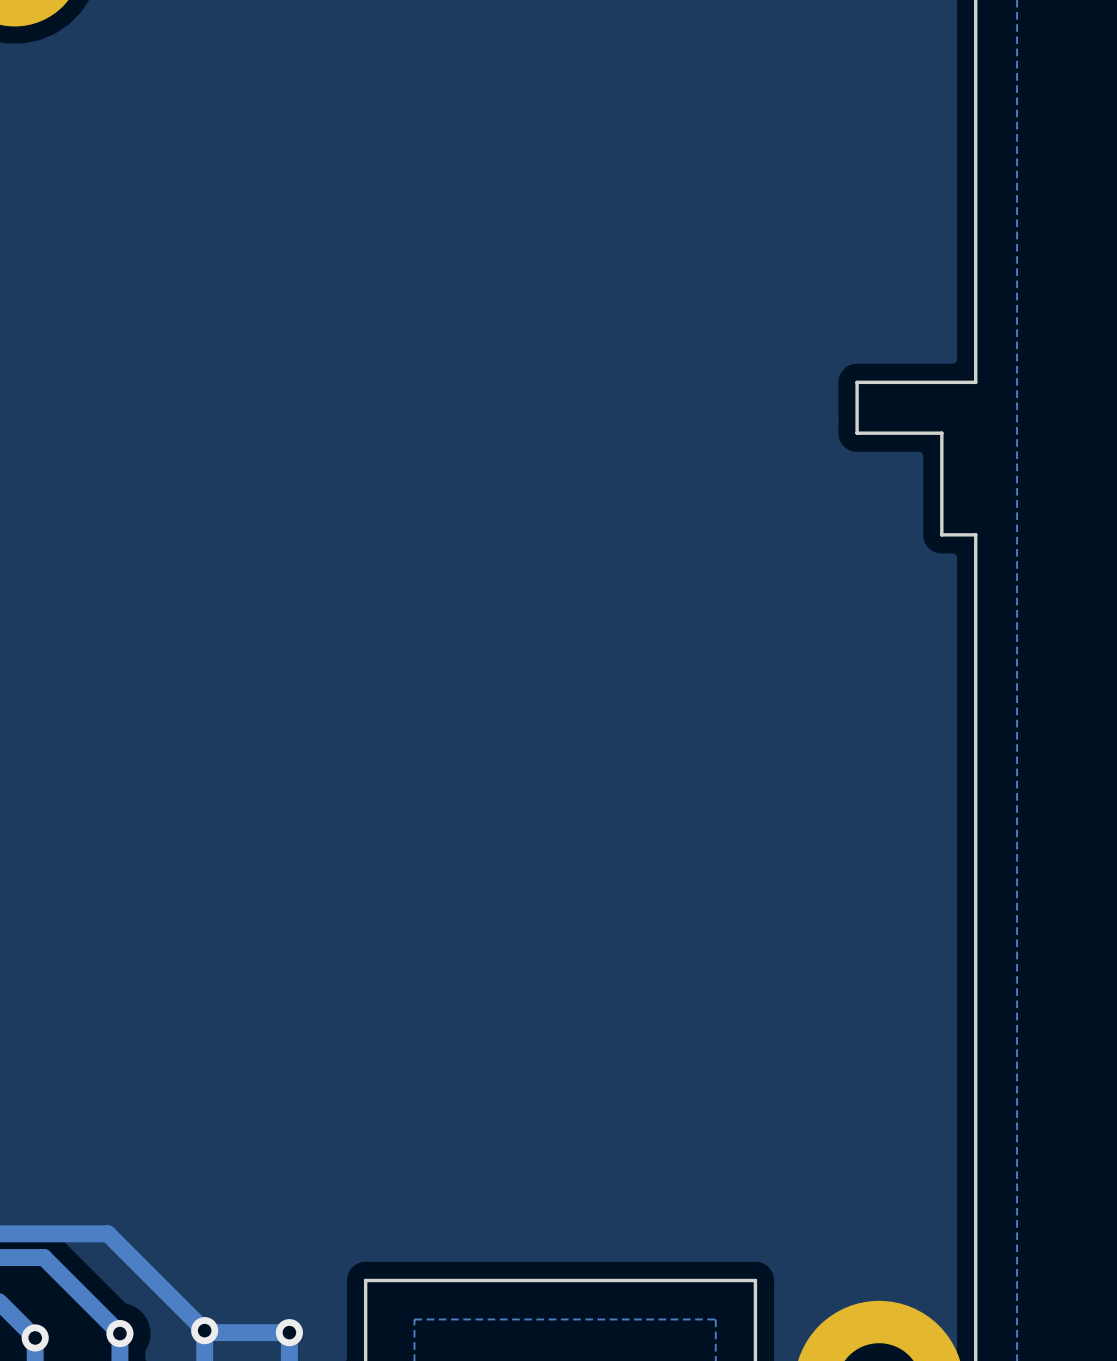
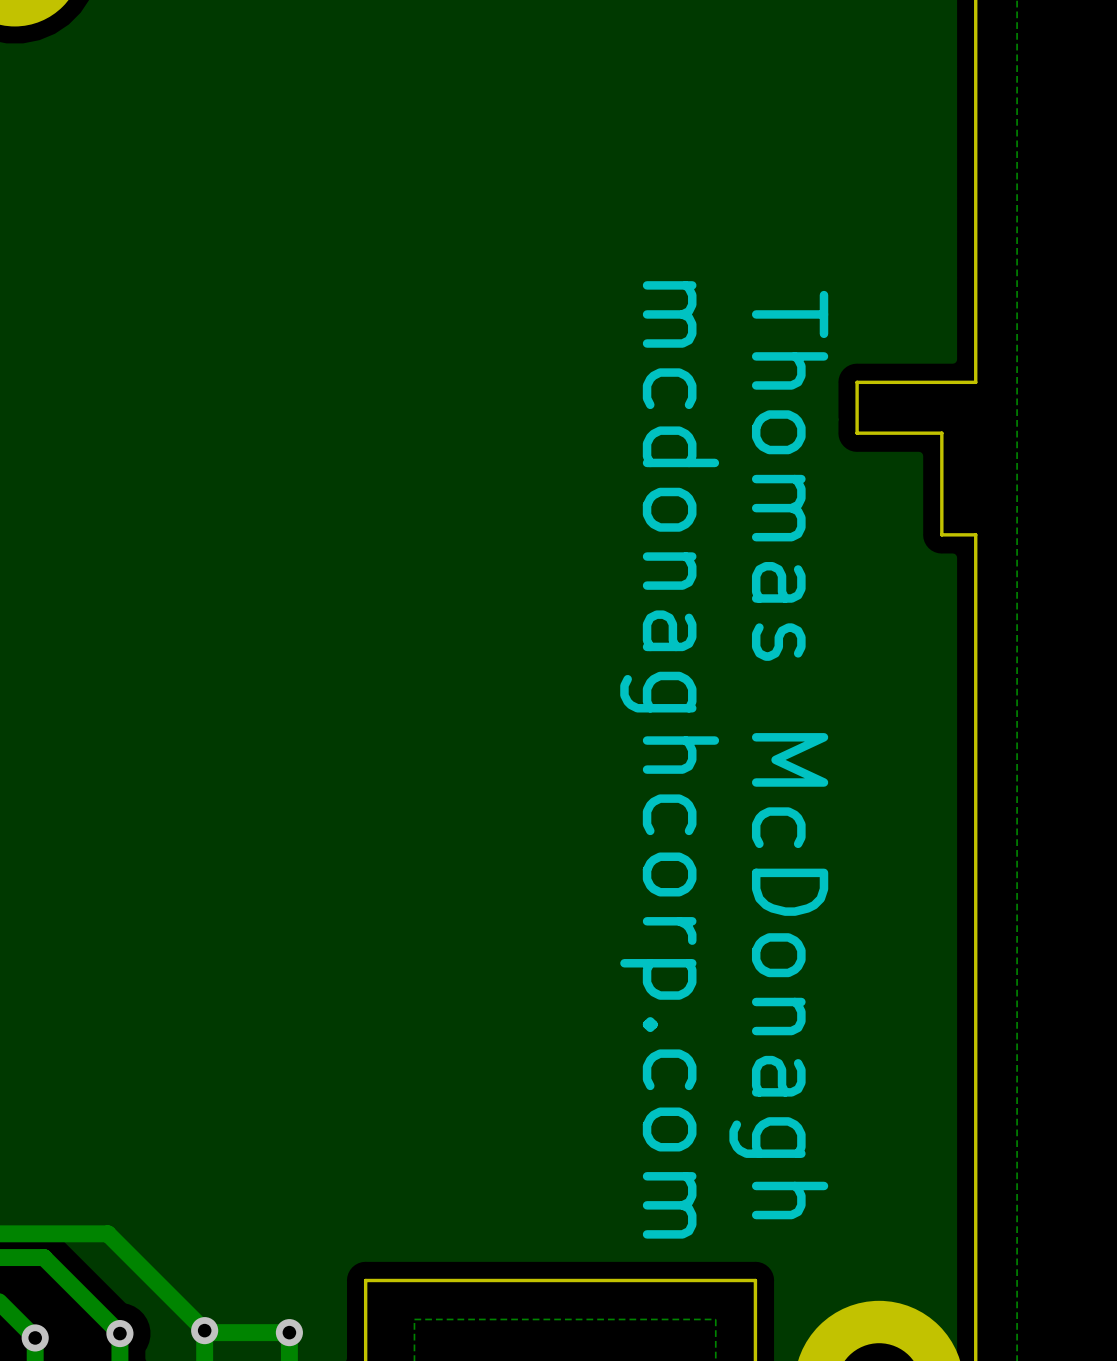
text: none -> Thomas McDonagh (778, 755)
text: none -> mcdonaghcorp.com (669, 759)

